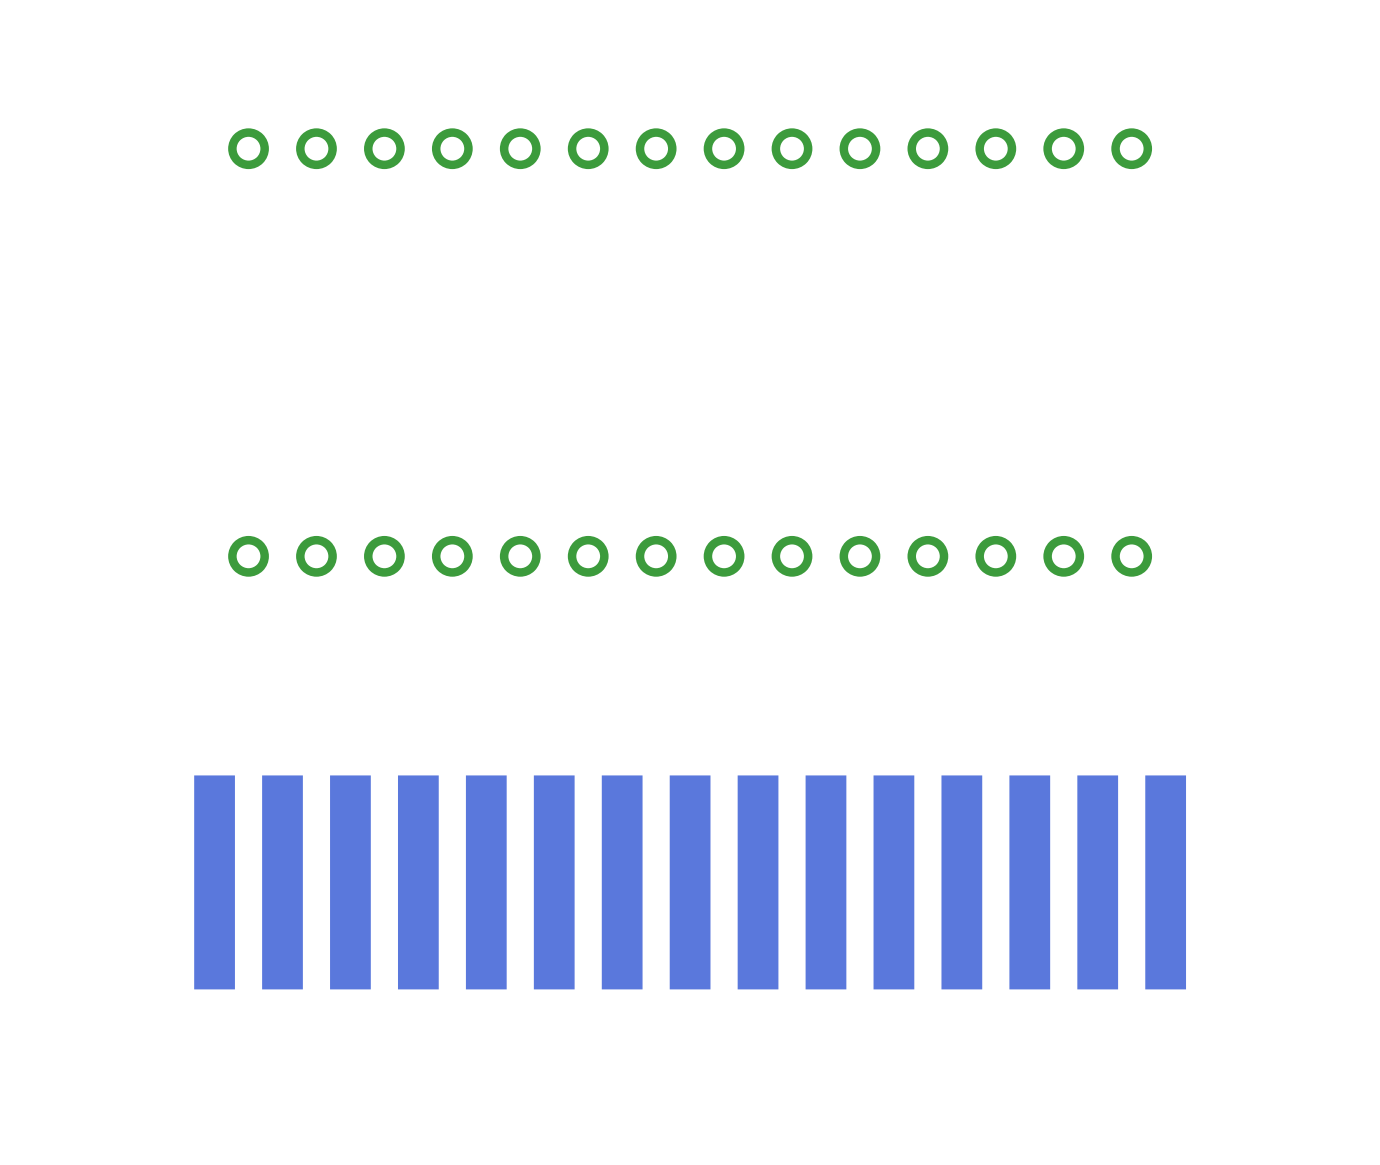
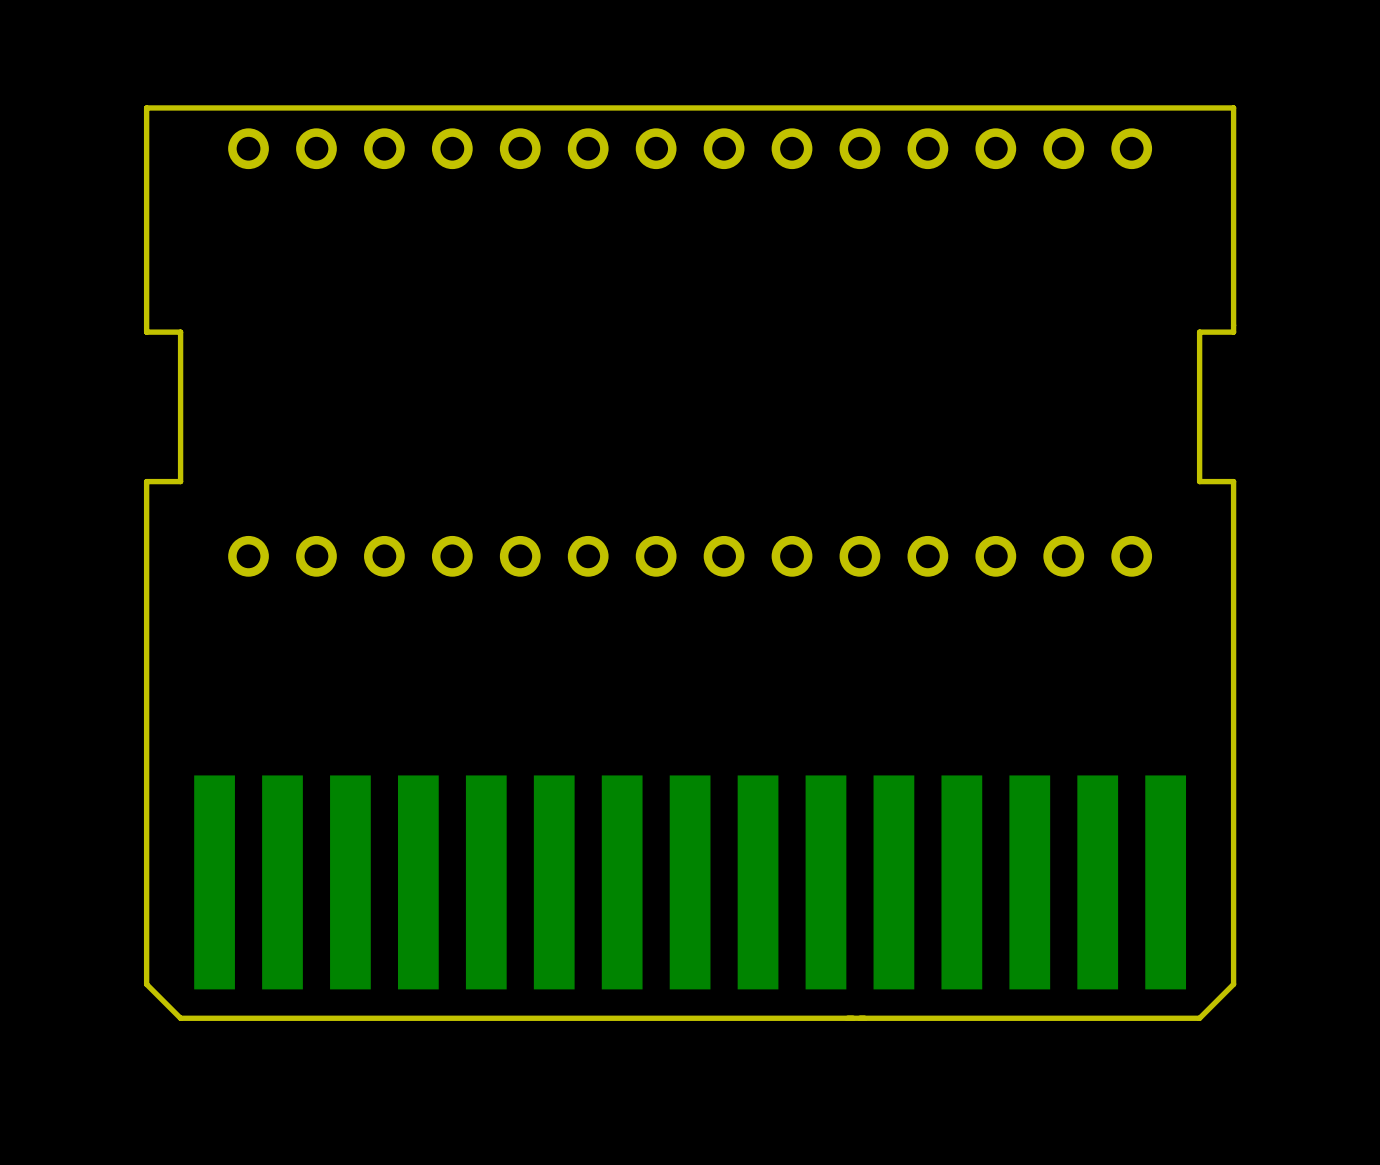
board edge: none -> (1233, 107) (1233, 332) (1199, 332) (1199, 481) (1233, 481) (1233, 984) (1199, 1018) (180, 1018) (146, 984) (146, 481) (180, 481) (180, 332) (146, 332) (146, 107) (1233, 107)

